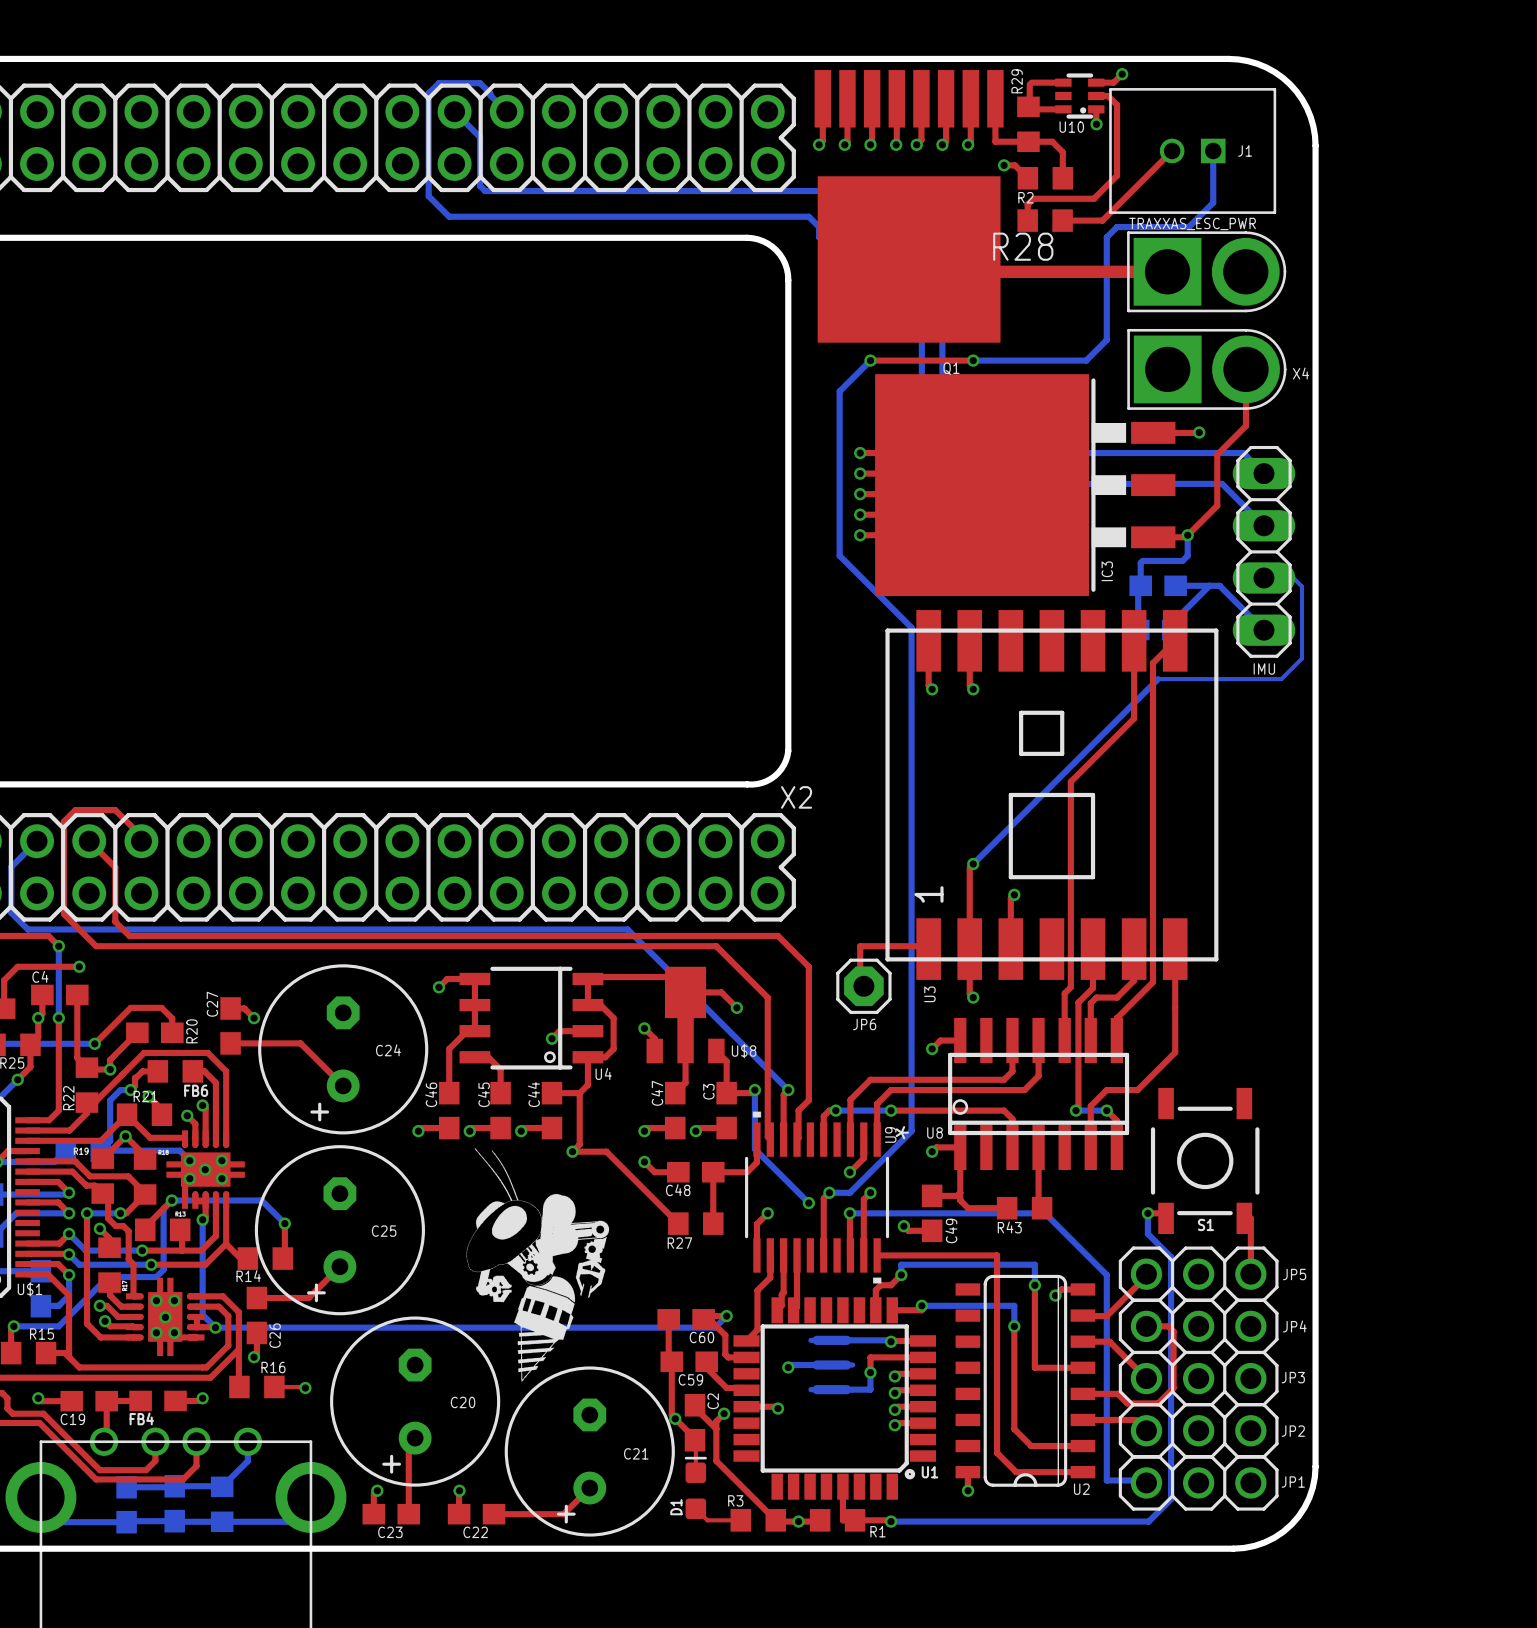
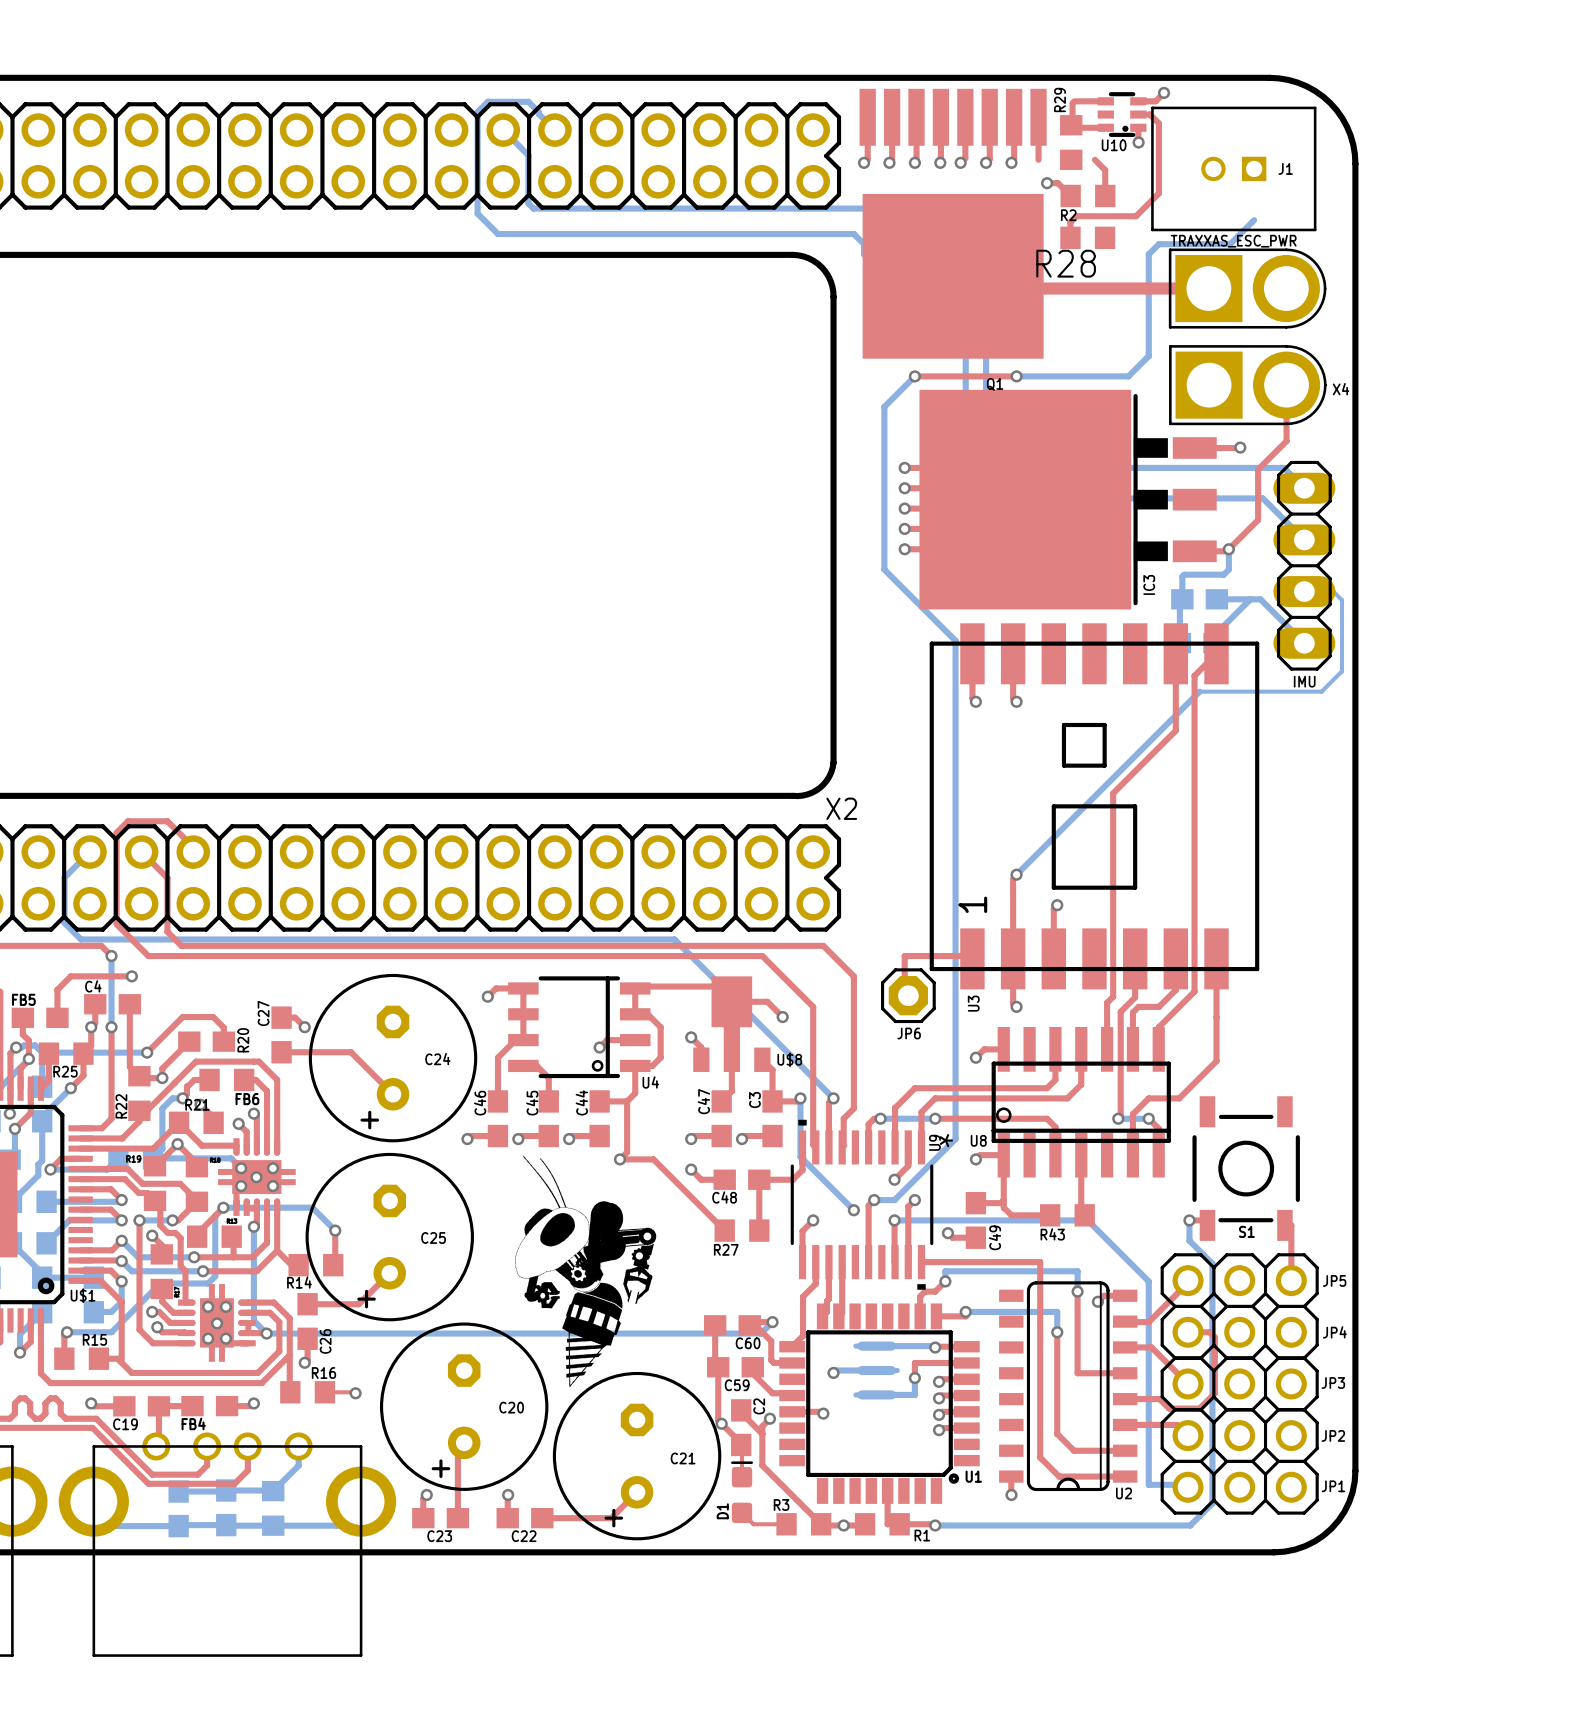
top track: (995, 141) (1052, 141) -> none
top track: (1172, 150) (1102, 220) (1062, 220) -> none
bottom track: (1213, 150) (1213, 202) -> none

